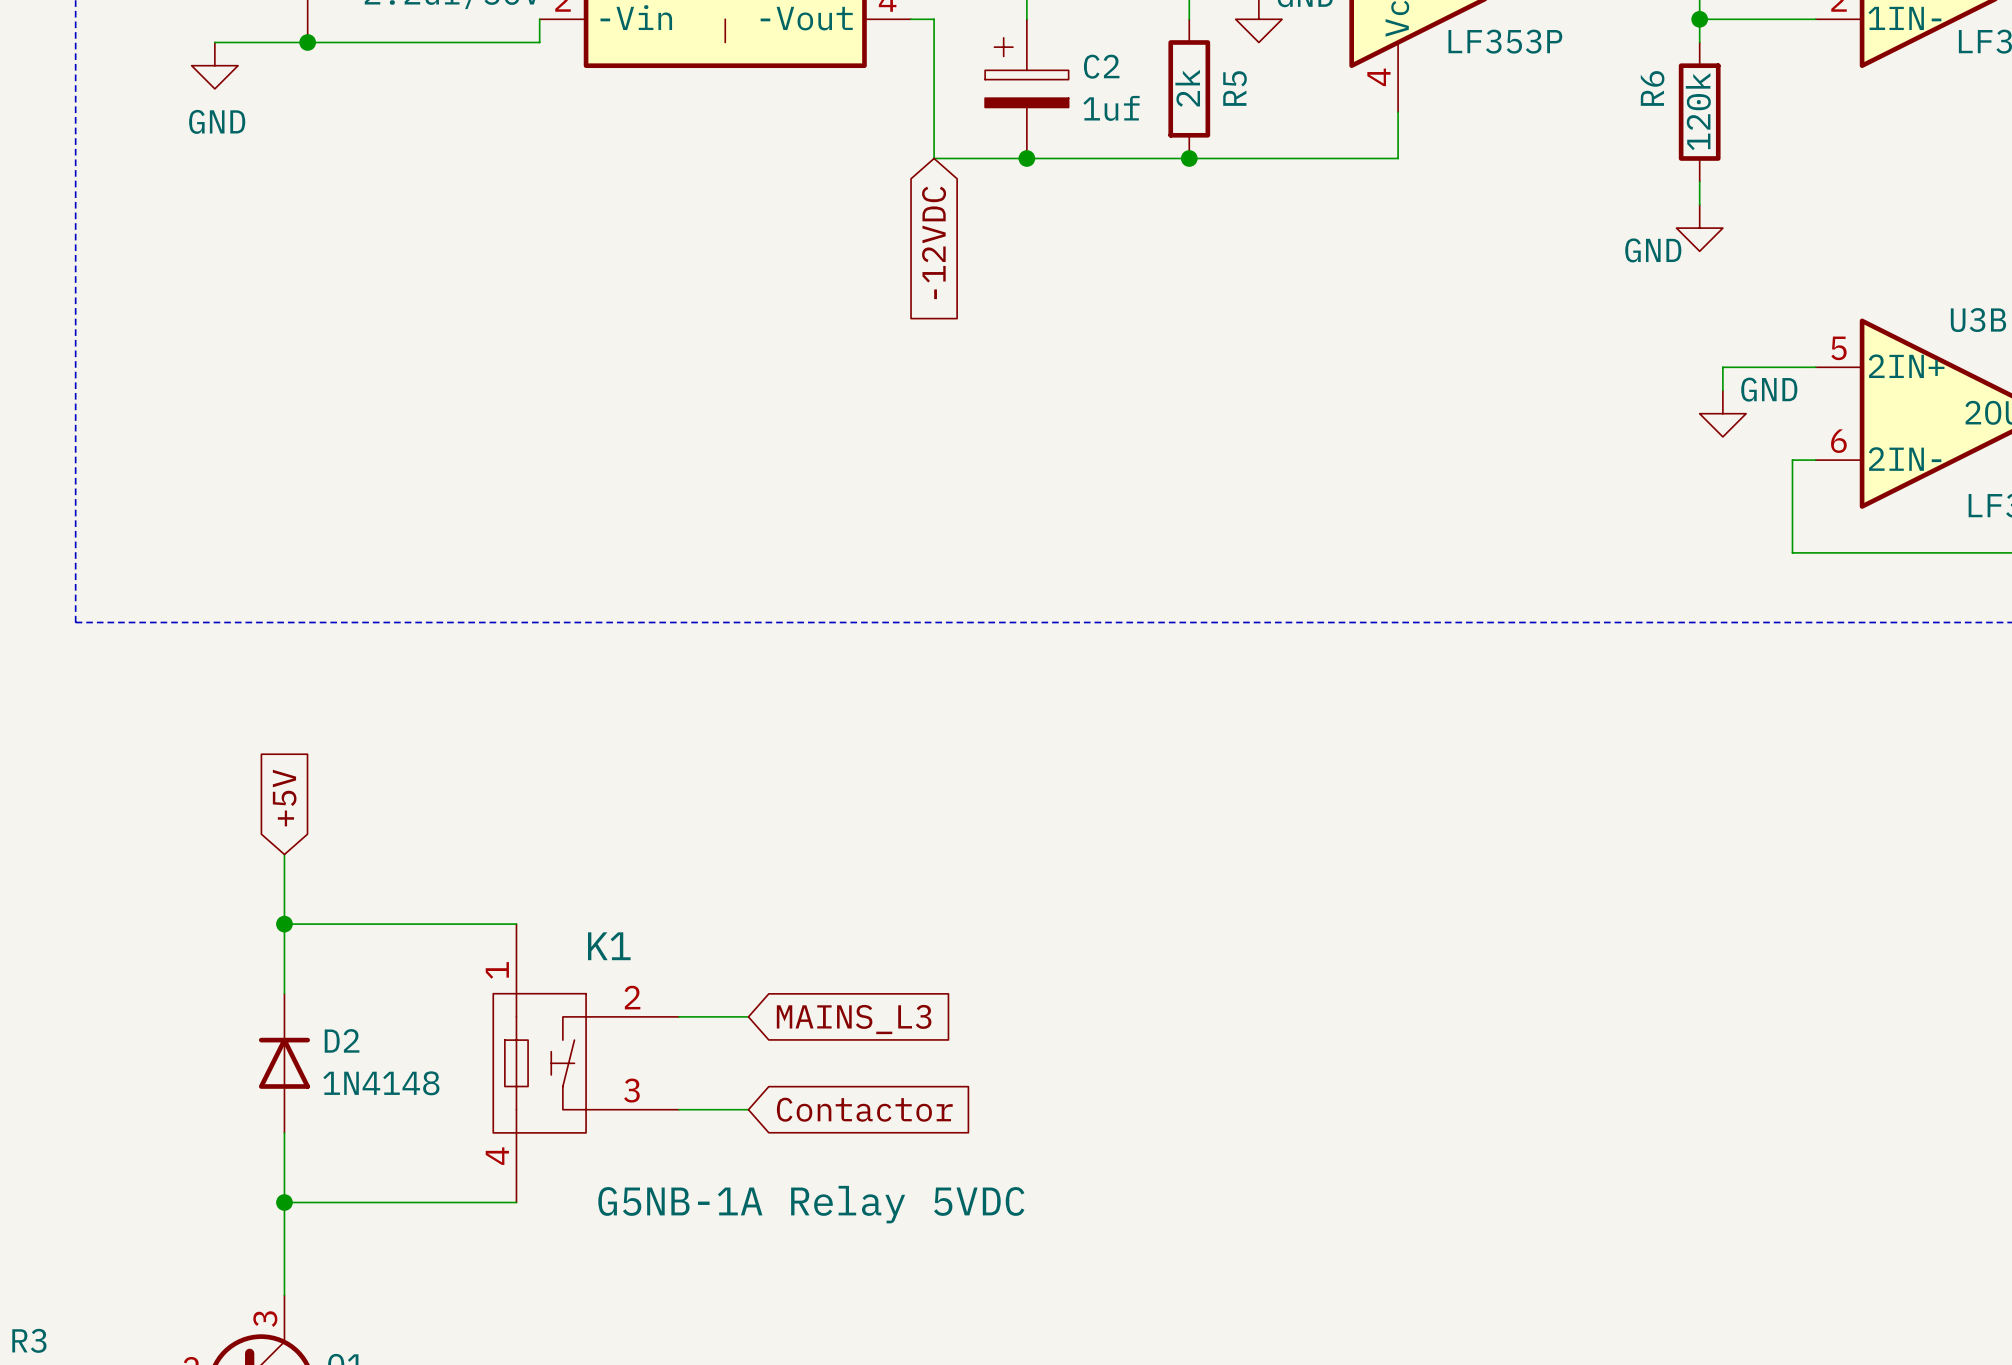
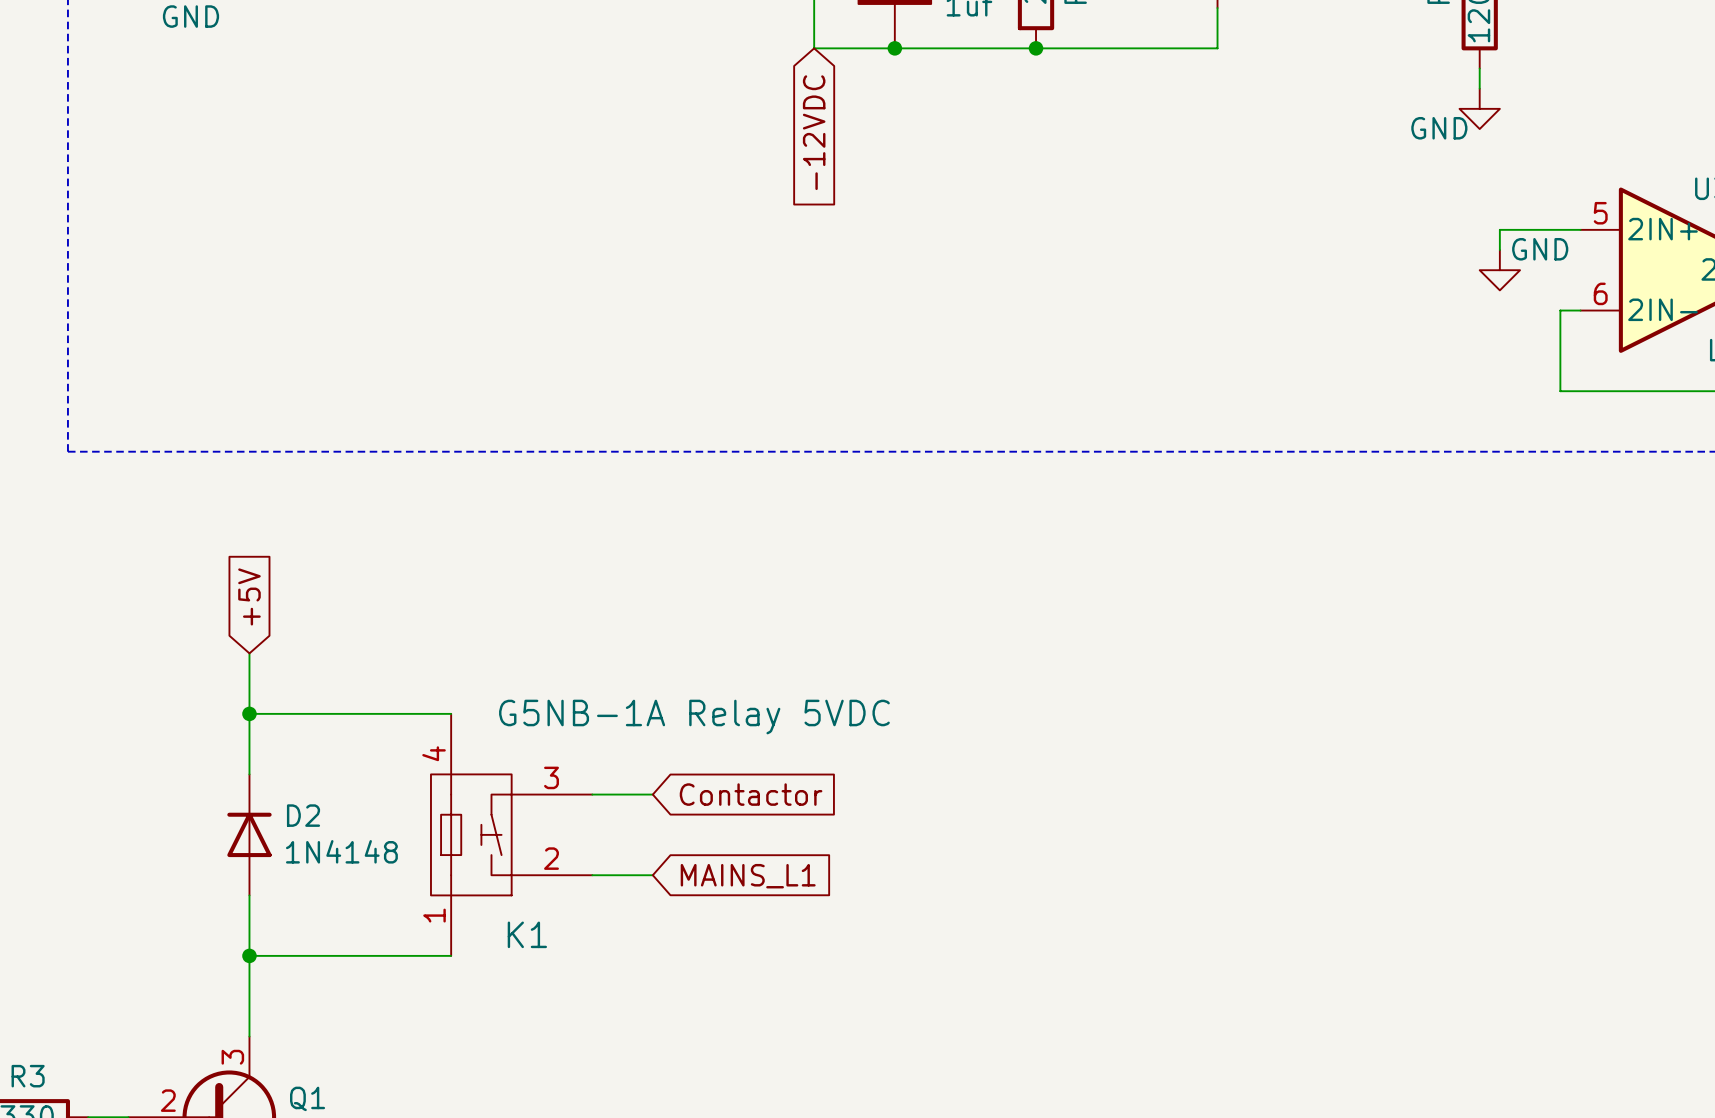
global label: MAINS_L3 (854, 1019) -> Contactor (751, 794)
K1 flip: as is (539, 1063) -> up-down (471, 834)
global label: Contactor (864, 1109) -> MAINS_L1 (748, 876)

